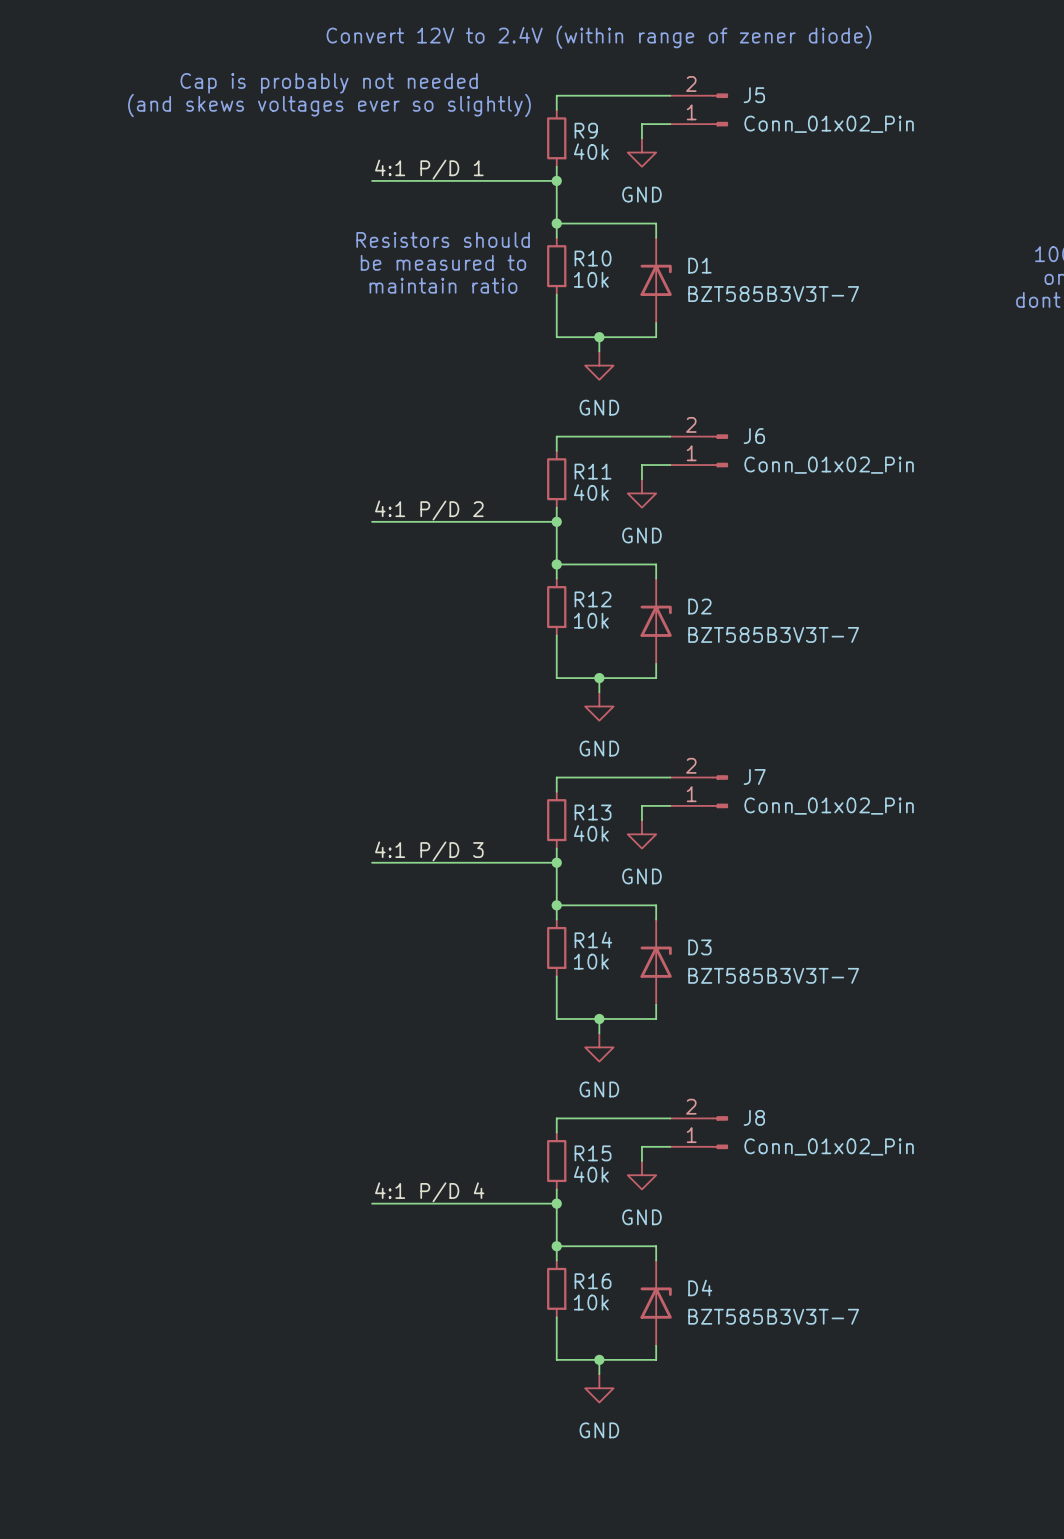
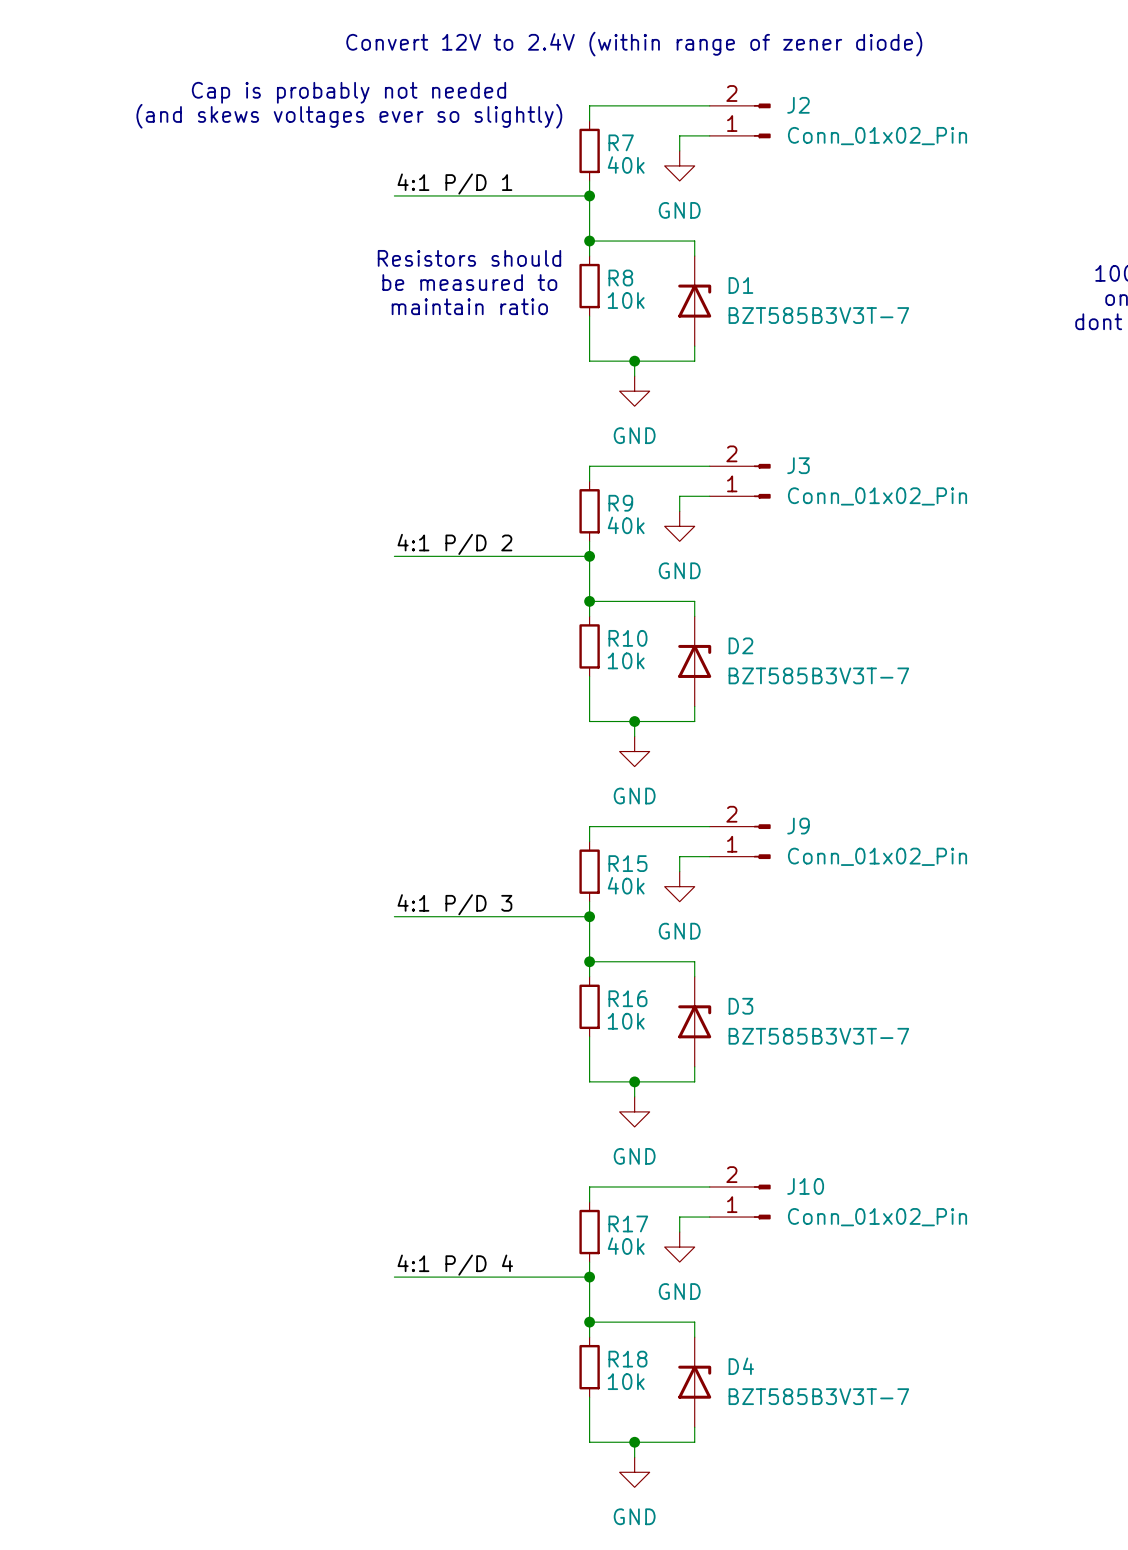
J5 name: J5 (754, 95) -> J2 (798, 105)
R9 name: R9 (586, 130) -> R7 (621, 142)
R10 name: R10 (593, 258) -> R8 (620, 278)
J6 name: J6 (754, 436) -> J3 (798, 465)
R11 name: R11 (593, 471) -> R9 (620, 503)
R12 name: R12 (593, 599) -> R10 (627, 638)
J7 name: J7 (754, 776) -> J9 (798, 826)
R13 name: R13 (593, 812) -> R15 (627, 863)
R14 name: R14 (593, 939) -> R16 (627, 998)
J8 name: J8 (754, 1117) -> J10 (805, 1186)
R15 name: R15 (593, 1153) -> R17 (628, 1223)
R16 name: R16 (593, 1281) -> R18 (627, 1359)

